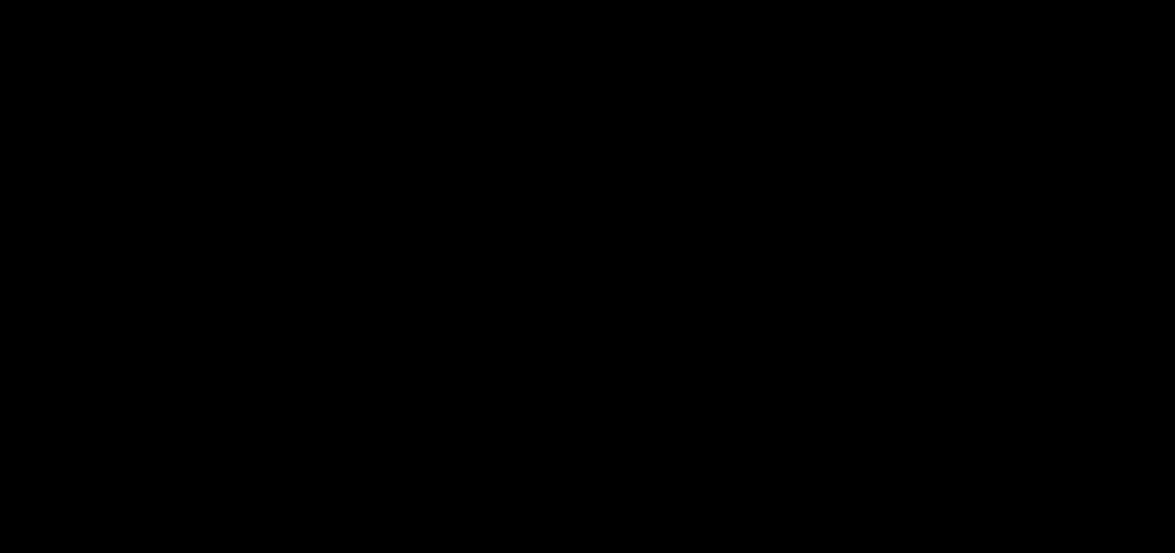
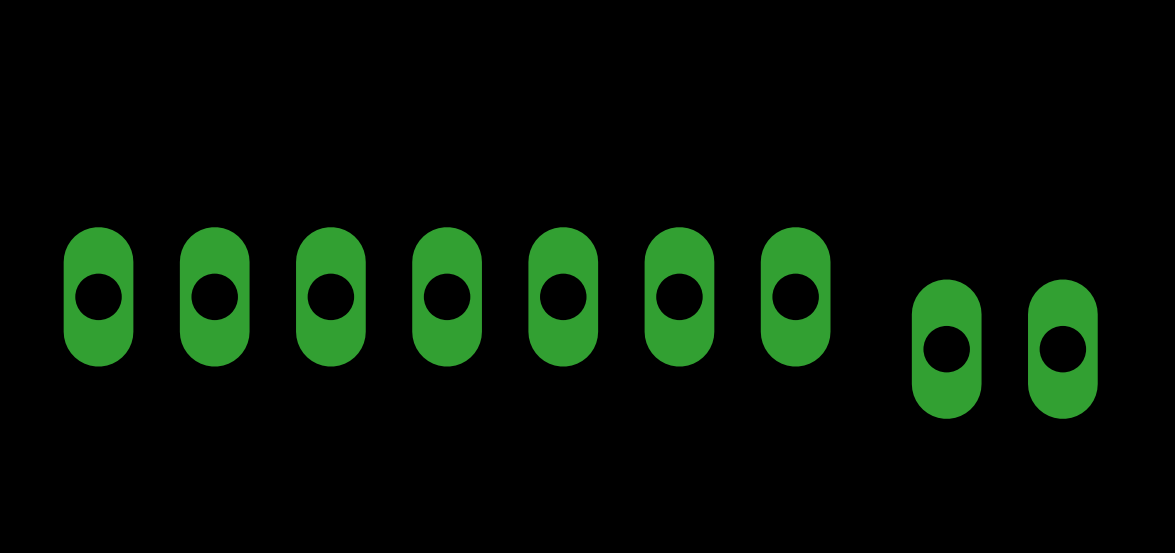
part: none -> (447, 296)
part: none -> (1004, 349)

